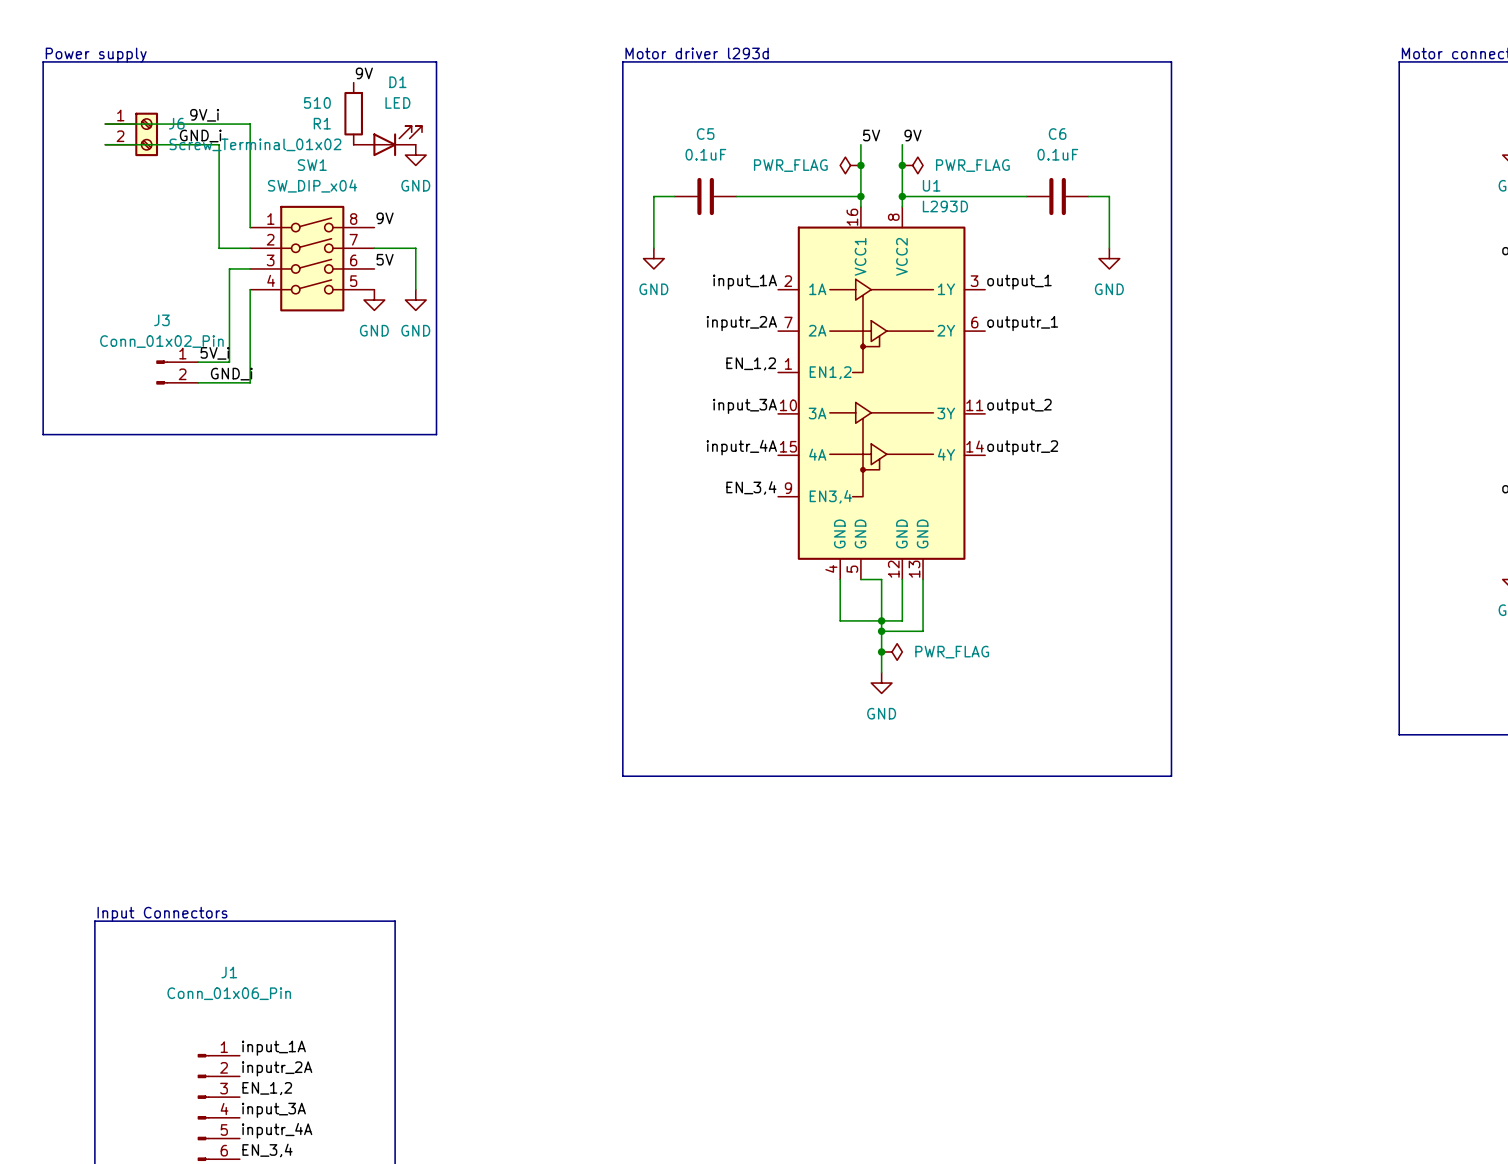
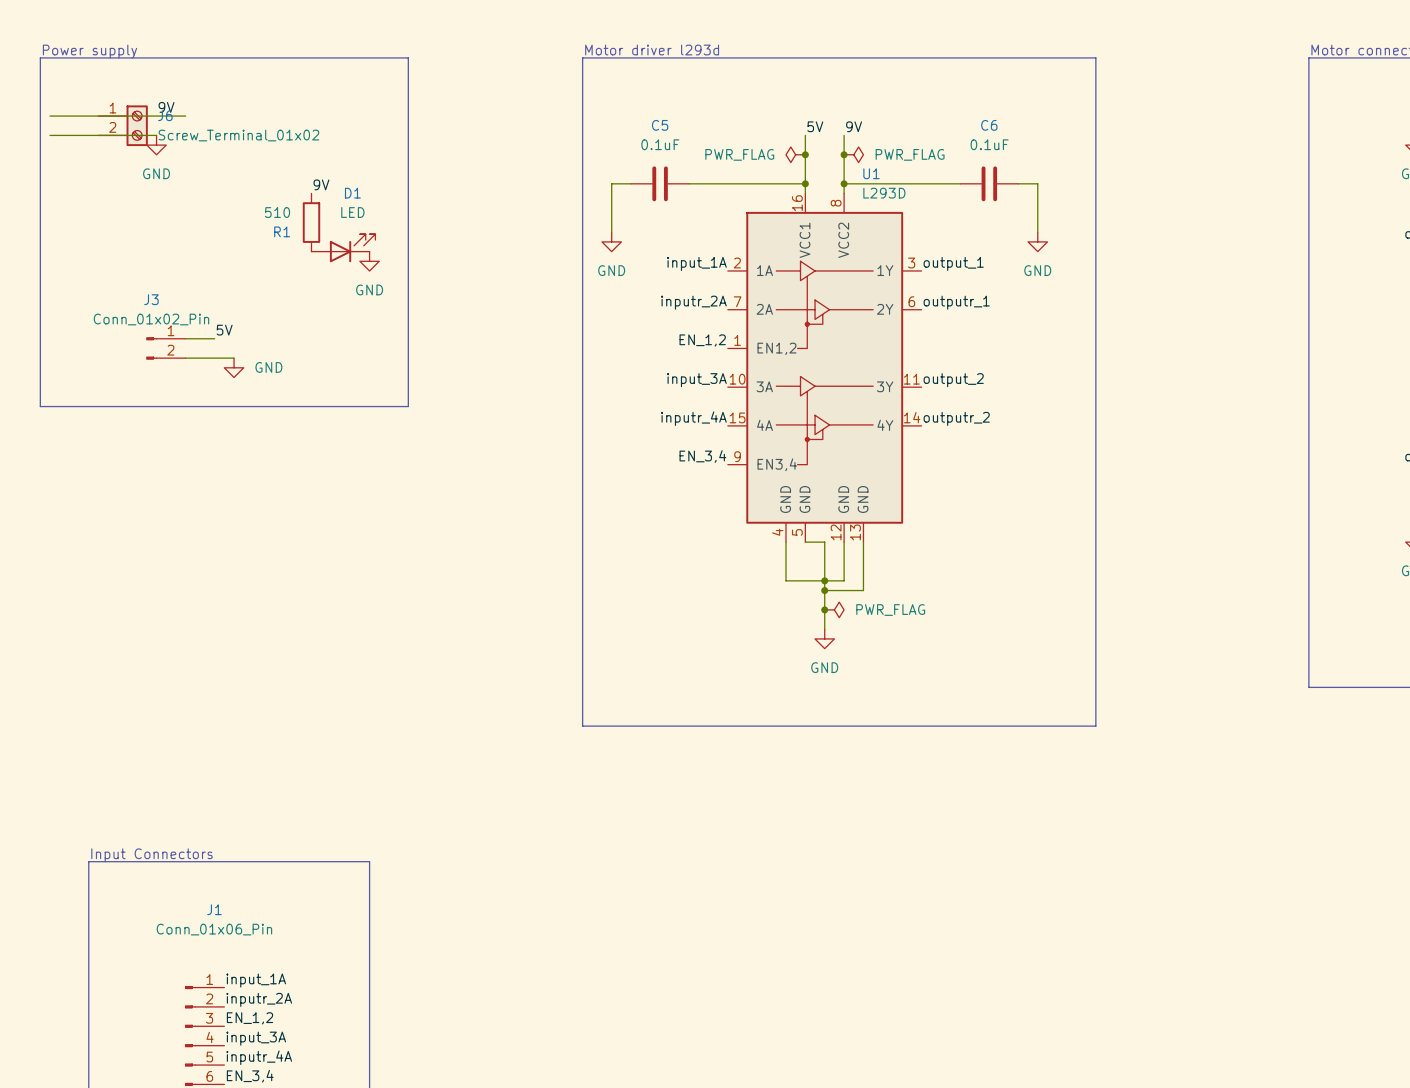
label: 9V (364, 73) -> none
R1 position: (353, 113) -> (311, 222)
label: 9V_i (204, 115) -> 9V (166, 107)
wire: none -> (50, 116) (98, 116)
wire: (198, 124) (250, 124) (250, 227) -> none
label: GND_i (200, 136) -> none
D1 position: (387, 141) -> (343, 248)
wire: none -> (50, 135) (98, 135)
wire: (167, 144) (219, 144) (219, 248) (250, 248) -> none
power symbol: none -> GND (156, 145)
power symbol: GND (415, 155) -> none
label position: 9V (385, 218) -> 9V (321, 184)
wire: (374, 248) (415, 248) (415, 289) -> none
SW1: SW_DIP_x04 (312, 258) -> none
label position: 5V (385, 259) -> 5V (224, 330)
wire: (250, 268) (229, 268) (229, 362) -> none
power symbol: none -> GND (369, 261)
wire: (250, 289) (250, 382) -> none
power symbol: GND (374, 300) -> none
power symbol: GND (415, 300) -> none
label: 5V_i (215, 353) -> none
label: GND_i (231, 374) -> none
power symbol: none -> GND (234, 367)

